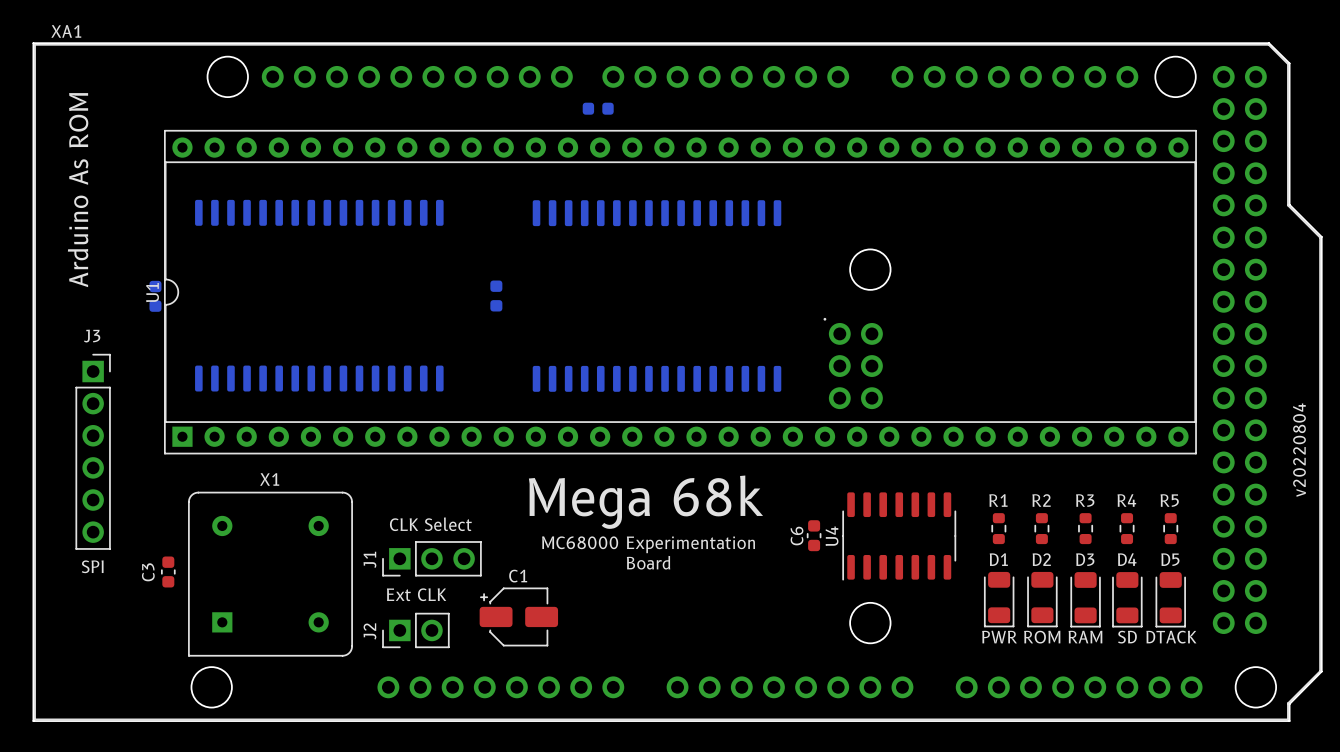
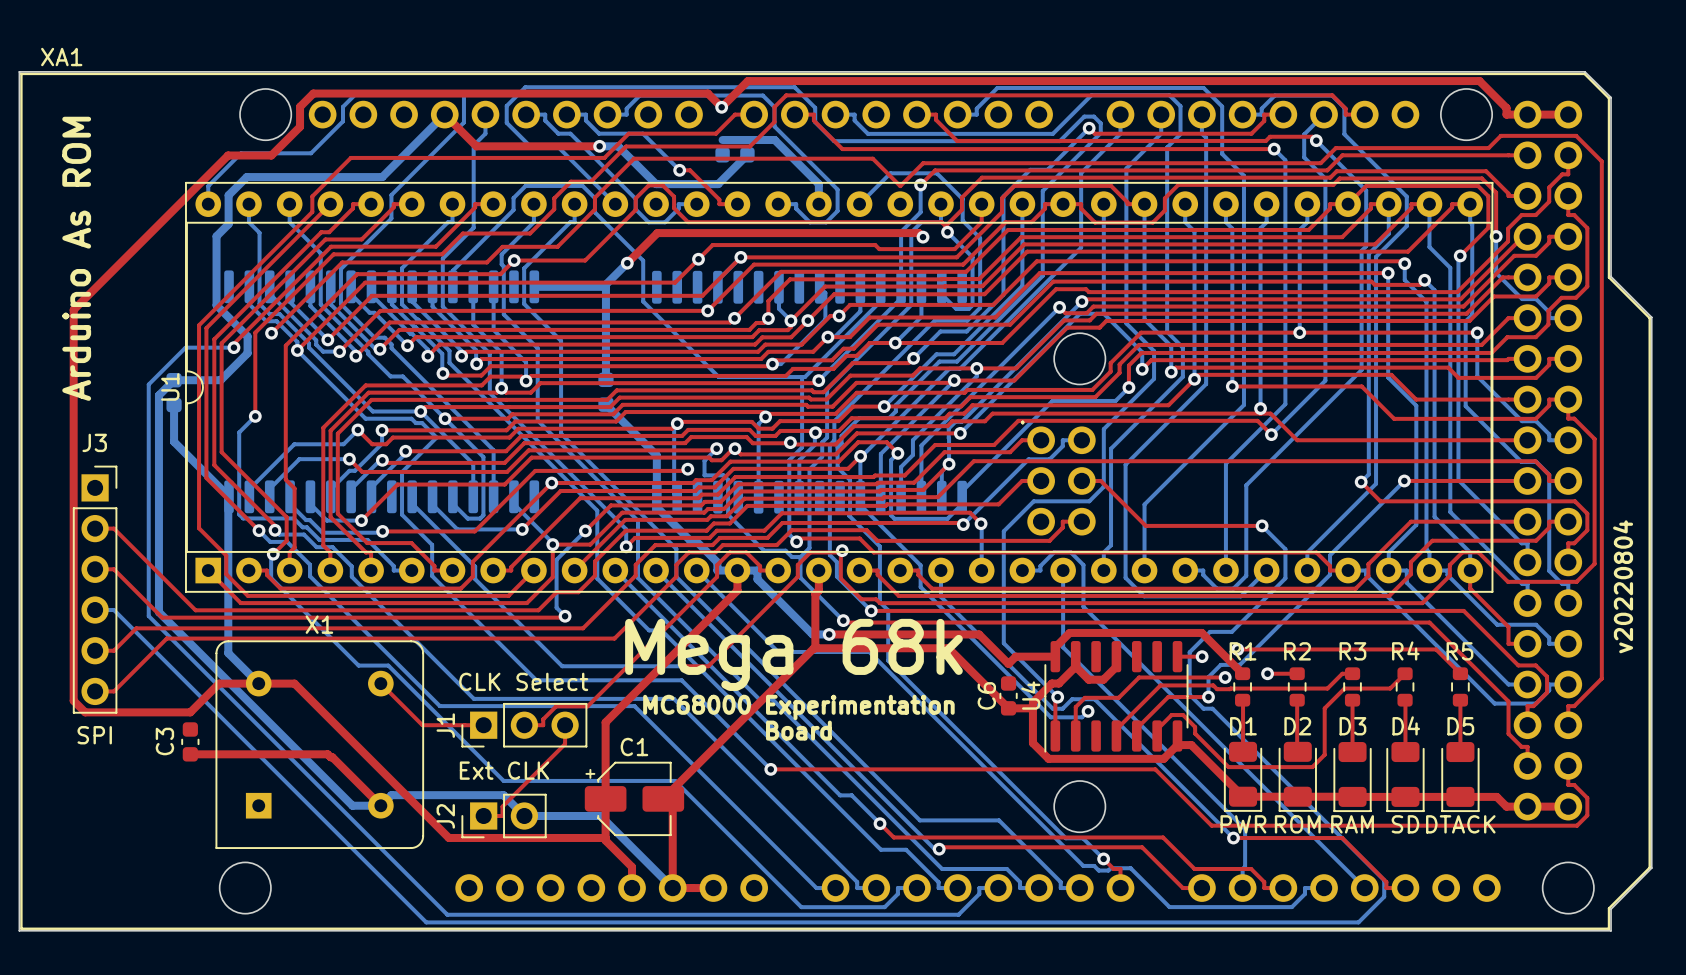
via: none -> (721, 107)
top track: none -> (444, 114) (476, 146) (599, 146)
bottom track: none -> (444, 114) (382, 177) (246, 177) (228, 195) (228, 224) (216, 236) (216, 305) (247, 336) (247, 353) (220, 380) (174, 380) (158, 395) (158, 612) (352, 805) (380, 805) (391, 795) (503, 795) (524, 815) (600, 815) (672, 888)
bottom track: none -> (485, 114) (485, 133) (473, 145) (473, 227) (442, 258) (442, 306) (489, 353) (489, 392) (626, 529) (626, 546)
bottom track: none -> (526, 114) (545, 114) (545, 120) (558, 133) (570, 133) (635, 198) (635, 209) (648, 222) (665, 222) (678, 208) (678, 204) (696, 204)
bottom track: none -> (566, 114) (585, 114) (585, 120) (599, 133) (643, 133) (679, 170)
bottom track: none -> (607, 114) (626, 114) (626, 108) (639, 95) (762, 95) (774, 107) (774, 126) (837, 189) (837, 211) (826, 222) (809, 222) (796, 208) (796, 204) (778, 204)
top track: none -> (754, 114) (735, 114) (716, 133) (628, 133) (604, 157) (350, 157) (312, 196) (312, 211) (199, 325) (199, 528) (226, 555) (226, 574) (247, 595) (508, 595) (533, 570)
top track: none -> (794, 114) (813, 114) (813, 120) (842, 149) (1274, 149)
bottom track: none -> (835, 114) (854, 114) (854, 120) (867, 133) (1052, 133) (1091, 95) (1169, 95) (1180, 106) (1180, 134) (1167, 147) (1167, 331) (1182, 347) (1182, 376) (1111, 448) (1111, 545) (1103, 552) (1103, 570)
top track: none -> (916, 114) (936, 114) (936, 119) (957, 140) (1265, 140) (1270, 136) (1312, 136) (1316, 140)
bottom track: none -> (957, 114) (976, 114) (976, 108) (997, 87) (1203, 87) (1222, 106) (1222, 153) (1243, 175) (1243, 405) (1144, 504) (1144, 570)
bottom track: none -> (1120, 114) (1120, 133) (1081, 173) (1081, 247) (960, 368) (949, 368) (860, 456)
bottom track: none -> (1161, 114) (1161, 133) (1126, 168) (1126, 323) (1154, 351) (1154, 378) (1103, 429) (1103, 486) (1089, 501) (1033, 501) (1003, 531) (1003, 643) (1057, 697)
bottom track: none -> (1201, 114) (1201, 133) (1206, 137) (1206, 384) (1125, 464) (1125, 577) (1144, 596) (1240, 596) (1266, 570)
bottom track: none -> (1242, 114) (1261, 114) (1261, 108) (1274, 95) (1332, 95) (1344, 107) (1344, 134) (1406, 196) (1406, 226) (1376, 256) (1376, 483) (1307, 552) (1307, 570)
top track: none -> (1283, 114) (1264, 114) (1264, 120) (1251, 133) (1094, 133) (1089, 128)
bottom track: none -> (1324, 114) (1304, 134) (1304, 157) (1325, 178) (1325, 380) (1271, 434)
top track: none -> (1364, 114) (1345, 114) (1345, 108) (1332, 95) (786, 95) (774, 107) (774, 121) (749, 146) (626, 146) (590, 181) (570, 181) (554, 198) (554, 209) (530, 233) (462, 233) (442, 254) (333, 254) (255, 332) (255, 416)
top track: none -> (1568, 114) (1506, 114) (1506, 108) (1479, 81) (747, 81) (721, 107) (707, 93) (313, 93) (300, 106) (300, 126) (271, 155) (228, 155) (73, 309) (73, 700) (85, 712) (190, 712) (219, 683) (294, 683) (448, 837) (605, 837)
bottom track: none -> (1089, 128) (1047, 169) (1030, 169) (1003, 196) (1003, 294) (966, 331) (940, 331) (913, 358)
via: none -> (1089, 128)
bottom track: none -> (722, 139) (774, 139) (818, 184) (818, 204)
bottom track: none -> (1316, 140) (1366, 190) (1366, 246) (1361, 250) (1361, 370) (1246, 485) (1246, 575) (1233, 588) (1216, 588) (1203, 575) (1203, 570) (1185, 570)
via: none -> (1316, 140)
bottom track: none -> (599, 146) (618, 146) (656, 184) (718, 184) (747, 154)
via: none -> (599, 146)
bottom track: none -> (1274, 149) (1285, 160) (1285, 404) (1225, 463) (1225, 570)
via: none -> (1274, 149)
top track: none -> (1527, 155) (1342, 155) (1327, 170) (935, 170) (920, 184)
top track: none -> (1568, 155) (1568, 174) (1562, 174) (1549, 187) (1549, 201) (1535, 215) (1521, 215) (1508, 228) (1508, 241) (1457, 292) (1088, 292) (1086, 289) (1056, 289) (1002, 342) (869, 342) (856, 355) (846, 355) (833, 368) (792, 368) (785, 375) (531, 375) (526, 381) (521, 376) (490, 376) (481, 385) (365, 385) (323, 427) (323, 545) (330, 552) (330, 570)
top track: none -> (679, 170) (690, 170) (719, 199) (719, 204) (737, 204)
via: none -> (679, 170)
bottom track: none -> (920, 184) (920, 212) (901, 231) (901, 298) (818, 380)
via: none -> (920, 184)
top track: none -> (1527, 196) (1508, 196) (1508, 193) (1486, 171) (1336, 171) (1330, 177) (981, 177) (961, 197) (961, 209) (945, 226)
top track: none -> (1568, 196) (1568, 215) (1574, 215) (1587, 228) (1587, 286) (1576, 297) (1561, 297) (1548, 310) (1548, 324) (1535, 337) (1507, 337) (1491, 352) (1141, 352) (1128, 365) (1128, 387)
bottom track: none -> (208, 204) (208, 186) (241, 153) (311, 153) (343, 121) (343, 106) (355, 94) (463, 94) (463, 122) (391, 195) (391, 218) (340, 268) (340, 304) (374, 337) (384, 337) (391, 344) (391, 348) (493, 450) (493, 496)
bottom track: none -> (248, 204) (248, 222) (259, 232) (259, 303) (269, 314) (279, 314) (309, 343) (309, 347) (372, 411) (420, 411) (473, 464) (473, 496)
bottom track: none -> (289, 204) (289, 222) (320, 253) (320, 304) (390, 376) (402, 376) (483, 457) (483, 515) (480, 518) (467, 518) (452, 503) (452, 496)
top track: none -> (330, 204) (206, 328) (206, 478) (259, 530)
top track: none -> (371, 204) (353, 204) (353, 208) (329, 232) (321, 232) (214, 339) (214, 465) (275, 525) (275, 530)
top track: none -> (411, 204) (393, 204) (393, 207) (361, 239) (325, 239) (221, 343) (221, 452) (286, 517) (286, 540) (273, 554)
bottom track: none -> (452, 204) (452, 222) (447, 222) (402, 268) (402, 304) (449, 350) (449, 362) (597, 510) (597, 578) (649, 630) (661, 630) (880, 849) (906, 849) (938, 882) (938, 888) (957, 888)
top track: none -> (493, 204) (475, 204) (475, 207) (435, 246) (331, 246) (233, 343) (233, 347)
bottom track: none -> (533, 204) (533, 222) (501, 254) (501, 264) (503, 266) (503, 314) (537, 348) (537, 420) (638, 520) (638, 578) (759, 699) (772, 699) (942, 868) (1006, 868) (1020, 882) (1020, 888) (1039, 888)
bottom track: none -> (574, 204) (574, 222) (570, 222) (524, 268) (524, 303) (561, 340) (561, 433) (676, 548) (676, 576) (919, 820) (999, 820) (1060, 882) (1060, 888) (1079, 888)
bottom track: none -> (615, 204) (557, 146) (530, 146) (506, 122) (506, 105) (525, 87) (794, 87) (815, 107) (815, 122) (834, 141) (1059, 141) (1084, 116) (1093, 116) (1100, 123) (1100, 133) (1042, 191) (1042, 275) (957, 361) (939, 361) (895, 405) (895, 411) (889, 418) (859, 418) (841, 435) (841, 443) (837, 447) (837, 467) (850, 480) (848, 515) (879, 546) (879, 602) (888, 610) (888, 660) (1065, 838) (1082, 838) (1103, 858)
bottom track: none -> (859, 204) (890, 173) (936, 173) (962, 199) (962, 220) (980, 238) (980, 307) (967, 320) (934, 320) (834, 421) (834, 440) (829, 445) (829, 555) (836, 562) (836, 576) (871, 610)
bottom track: none -> (940, 204) (940, 222) (921, 222) (911, 232) (911, 305) (827, 389) (827, 437) (822, 442) (822, 456) (809, 469) (809, 548) (800, 557)
top track: none -> (981, 204) (981, 222) (954, 249) (879, 249) (875, 245) (712, 245) (675, 282) (365, 282) (297, 350)
bottom track: none -> (1022, 204) (1022, 285) (954, 354) (936, 354) (884, 406)
bottom track: none -> (1103, 204) (1103, 313)
top track: none -> (1144, 204) (1127, 204) (1111, 185) (1014, 185) (1002, 198) (1002, 212) (956, 257) (740, 257) (702, 295) (371, 295) (327, 339)
bottom track: none -> (1144, 204) (1144, 319) (1171, 346) (1171, 372)
bottom track: none -> (1185, 204) (1185, 222) (1194, 231) (1194, 379)
bottom track: none -> (1225, 204) (1225, 222) (1232, 228) (1232, 386)
bottom track: none -> (1266, 204) (1266, 222) (1260, 228) (1260, 408)
bottom track: none -> (1307, 204) (1307, 222) (1299, 229) (1299, 332)
top track: none -> (1388, 204) (1370, 204) (1370, 208) (1342, 237) (1021, 237) (979, 279) (790, 279) (768, 300) (768, 318) (763, 322) (756, 322) (749, 329) (399, 329) (379, 349)
bottom track: none -> (1388, 204) (1388, 233) (1368, 253) (1368, 474) (1361, 482)
top track: none -> (1429, 204) (1411, 204) (1411, 208) (1375, 244) (1024, 244) (982, 286) (825, 286) (790, 320) (790, 327) (787, 330) (759, 330) (752, 337) (416, 337) (407, 345)
bottom track: none -> (1429, 204) (1429, 247) (1450, 267) (1450, 512) (1522, 584) (1527, 584) (1527, 603)
top track: none -> (1470, 204) (1452, 204) (1452, 207) (1408, 251) (1027, 251) (984, 294) (834, 294) (791, 337) (762, 337) (755, 344) (439, 344) (427, 356)
bottom track: none -> (1470, 204) (1470, 222) (1472, 224) (1472, 314) (1465, 321) (1465, 406) (1521, 461) (1536, 461) (1549, 474) (1549, 570) (1562, 584) (1568, 584) (1568, 603)
top track: none -> (945, 226) (941, 222) (688, 222) (674, 208) (674, 196) (662, 185) (648, 185) (635, 198) (635, 210) (585, 260) (514, 260) (500, 274) (357, 274) (285, 345) (285, 479) (294, 488) (294, 547) (289, 552) (289, 570)
bottom track: none -> (947, 232) (972, 257) (972, 305) (968, 308) (956, 308) (941, 294) (941, 287)
via: none -> (947, 232)
top track: none -> (923, 237) (918, 233) (657, 233) (627, 263)
via: none -> (923, 237)
top track: none -> (1496, 236) (1496, 192) (1481, 178) (1339, 178) (1333, 184) (1178, 184) (1164, 198) (1164, 210) (1152, 222) (1095, 222) (1081, 208) (1081, 204) (1045, 204) (1045, 208) (1031, 222) (1005, 222) (963, 264) (754, 264) (707, 310) (380, 310) (339, 351)
bottom track: none -> (1496, 236) (1496, 272) (1522, 299) (1536, 299) (1549, 312) (1549, 318) (1568, 318)
via: none -> (1496, 236)
top track: none -> (1527, 236) (1523, 236) (1460, 299) (1084, 299) (1081, 301)
top track: none -> (1568, 236) (1549, 236) (1549, 242) (1536, 255) (1514, 255) (1463, 306) (1093, 306) (1086, 313) (1065, 313) (1059, 307)
top track: none -> (1460, 255) (1488, 227) (1488, 196) (1478, 185) (1366, 185) (1348, 204) (1330, 204) (1330, 208) (1308, 229) (1008, 229) (966, 271) (781, 271) (730, 322) (389, 322) (355, 356)
bottom track: none -> (1460, 255) (1458, 257) (1458, 480) (1521, 543) (1527, 543) (1527, 562)
via: none -> (1460, 255)
via: none -> (740, 257)
via: none -> (698, 259)
via: none -> (514, 260)
bottom track: none -> (627, 263) (605, 284) (605, 379)
via: none -> (627, 263)
top track: none -> (1404, 263) (1402, 261) (1036, 261) (993, 304) (850, 304) (839, 315) (830, 315) (801, 344) (765, 344) (758, 351) (466, 351) (461, 356)
bottom track: none -> (1404, 263) (1404, 280) (1426, 301) (1426, 549) (1429, 552) (1429, 570) (1447, 570) (1447, 575) (1497, 624) (1536, 624) (1549, 637) (1549, 643) (1568, 643)
via: none -> (1404, 263)
top track: none -> (1388, 273) (1039, 273) (995, 317) (869, 317) (850, 337) (827, 337) (813, 351) (768, 351) (761, 359) (481, 359) (476, 363)
bottom track: none -> (1388, 273) (1388, 377) (1416, 405) (1416, 524) (1388, 552) (1388, 570) (1406, 570) (1406, 582) (1508, 684) (1527, 684)
via: none -> (1388, 273)
top track: none -> (1527, 277) (1502, 277) (1466, 313) (1096, 313) (1089, 320) (1064, 320) (1016, 368) (919, 368) (912, 375) (850, 375) (826, 399) (810, 399) (809, 397) (619, 397) (610, 407) (425, 407) (420, 411)
top track: none -> (1568, 277) (1549, 277) (1549, 283) (1536, 296) (1493, 296) (1469, 320) (1106, 320) (1099, 327) (1067, 327) (1014, 380) (856, 382) (832, 406) (807, 406) (806, 404) (622, 404) (613, 414) (512, 414) (508, 418) (445, 418)
top track: none -> (1424, 280) (1419, 284) (1374, 284) (1371, 281) (1053, 281) (1010, 324) (877, 324) (853, 348) (843, 348) (831, 360) (776, 360) (770, 366) (490, 366) (481, 375) (445, 375) (442, 373)
bottom track: none -> (1424, 280) (1434, 290) (1434, 516) (1470, 552) (1470, 570)
via: none -> (1424, 280)
bottom track: none -> (249, 286) (249, 304) (266, 321) (276, 321) (297, 342) (297, 350) (365, 418) (411, 418) (415, 423) (422, 423) (436, 437) (402, 472) (402, 514) (432, 544) (432, 576) (536, 680) (681, 680) (770, 769)
bottom track: none -> (269, 286) (269, 293) (316, 340) (316, 344) (323, 351) (339, 351)
bottom track: none -> (290, 286) (290, 302) (327, 339)
bottom track: none -> (310, 286) (310, 306) (355, 351) (355, 356)
bottom track: none -> (330, 286) (330, 304) (375, 349) (379, 349)
bottom track: none -> (351, 286) (351, 294) (369, 312) (374, 312) (407, 345)
bottom track: none -> (371, 286) (371, 294) (427, 349) (427, 356)
bottom track: none -> (391, 286) (391, 304) (442, 353) (442, 373)
bottom track: none -> (412, 286) (412, 301) (461, 351) (461, 356)
bottom track: none -> (432, 286) (432, 306) (476, 350) (476, 363)
bottom track: none -> (452, 286) (452, 270) (513, 210) (513, 198) (525, 185) (582, 185) (594, 198) (594, 212) (643, 260) (643, 301) (718, 377) (804, 377) (880, 301) (880, 287)
bottom track: none -> (473, 286) (473, 324) (501, 352) (501, 388)
bottom track: none -> (493, 286) (493, 329) (526, 362) (526, 381)
bottom track: none -> (534, 286) (605, 286)
bottom track: none -> (778, 287) (778, 308) (790, 320)
bottom track: none -> (819, 287) (825, 292) (825, 319) (780, 364) (772, 364)
bottom track: none -> (860, 287) (860, 311) (834, 337) (827, 337)
bottom track: none -> (921, 287) (921, 316) (895, 342)
bottom track: none -> (1081, 301) (961, 421) (955, 421) (948, 428) (949, 464) (941, 471) (941, 497)
via: none -> (1081, 301)
bottom track: none -> (1059, 307) (921, 445) (921, 497)
via: none -> (1059, 307)
via: none -> (707, 310)
bottom track: none -> (1103, 313) (1142, 352) (1142, 369)
bottom track: none -> (1103, 313) (1079, 313) (960, 433)
via: none -> (839, 315)
via: none -> (734, 318)
via: none -> (768, 318)
top track: none -> (1527, 318) (1508, 318) (1481, 344) (1139, 344) (1119, 364) (1119, 372) (1095, 397) (970, 397) (961, 406) (884, 406)
via: none -> (790, 320)
via: none -> (807, 320)
via: none -> (1299, 332)
top track: none -> (271, 333) (342, 262) (486, 262) (502, 246) (557, 246) (594, 209) (594, 197) (634, 158) (872, 158) (900, 186) (923, 163) (1320, 163) (1335, 148) (1488, 148) (1500, 135) (1576, 135) (1601, 161) (1601, 678) (1574, 706) (1568, 706) (1568, 725)
via: none -> (271, 333)
top track: none -> (1477, 332) (1141, 332) (1110, 363) (1110, 371) (1092, 389) (856, 392) (835, 413) (765, 414)
bottom track: none -> (1477, 332) (1477, 376) (1522, 421) (1536, 421) (1549, 434) (1549, 440) (1568, 440)
via: none -> (1477, 332)
via: none -> (827, 337)
via: none -> (327, 339)
via: none -> (895, 342)
via: none -> (407, 345)
bottom track: none -> (233, 347) (185, 347) (148, 384) (148, 616) (447, 914) (958, 914) (979, 894) (979, 888) (998, 888)
via: none -> (233, 347)
via: none -> (379, 349)
via: none -> (297, 350)
via: none -> (339, 351)
via: none -> (355, 356)
via: none -> (427, 356)
via: none -> (461, 356)
top track: none -> (913, 358) (908, 363) (852, 363) (823, 392) (813, 392) (812, 390) (616, 390) (607, 399) (371, 399) (337, 433) (337, 513) (367, 543) (411, 543) (434, 566) (434, 570) (452, 570)
via: none -> (913, 358)
top track: none -> (1527, 358) (1151, 360) (1142, 369)
top track: none -> (1568, 358) (1549, 358) (1549, 364) (1536, 377) (1458, 377) (1448, 367) (1175, 367) (1171, 372)
via: none -> (476, 363)
via: none -> (772, 364)
bottom track: none -> (976, 368) (976, 376) (912, 440) (912, 455) (901, 466) (901, 497)
via: none -> (976, 368)
via: none -> (1142, 369)
via: none -> (1171, 372)
via: none -> (442, 373)
bottom track: none -> (802, 377) (802, 447) (789, 460) (789, 534) (796, 541)
via: none -> (1194, 379)
top track: none -> (818, 380) (816, 383) (540, 383) (530, 392) (506, 392) (501, 388) (497, 392) (368, 392) (330, 430) (330, 517) (365, 552) (371, 552) (371, 570)
via: none -> (818, 380)
bottom track: none -> (954, 380) (880, 453) (880, 497)
via: none -> (954, 380)
via: none -> (526, 381)
top track: none -> (1232, 386) (1361, 386) (1394, 418) (1535, 418) (1549, 405) (1549, 399) (1568, 399) (1568, 418) (1574, 418) (1594, 438) (1594, 563) (1576, 581) (1507, 581) (1478, 552) (1462, 552) (1449, 564) (1449, 575) (1422, 603) (879, 603) (876, 599) (861, 599) (840, 578) (842, 550)
via: none -> (1232, 386)
via: none -> (501, 388)
bottom track: none -> (1128, 387) (1115, 400) (1052, 400) (962, 491) (962, 504) (947, 518) (894, 518) (891, 515) (891, 460) (897, 453)
via: none -> (1128, 387)
top track: none -> (1527, 399) (1416, 399) (1391, 374) (1198, 374) (1168, 405) (972, 405) (964, 413) (949, 413) (945, 418) (851, 418) (838, 430) (780, 430) (775, 435) (755, 435) (749, 429) (688, 429) (682, 435) (521, 435) (506, 451) (405, 451)
bottom track: none -> (605, 404) (656, 455) (656, 507) (690, 540) (695, 540) (717, 562) (717, 570) (757, 570) (757, 579) (812, 634) (829, 634)
bottom track: none -> (174, 405) (174, 441) (229, 496) (228, 653) (258, 683)
top track: none -> (884, 406) (853, 406) (838, 421) (780, 421) (772, 428) (758, 428) (751, 421) (679, 421) (672, 428) (518, 428) (509, 437) (392, 437) (386, 444) (372, 444) (357, 429)
via: none -> (884, 406)
via: none -> (1260, 408)
via: none -> (420, 411)
top track: none -> (765, 414) (762, 412) (625, 412) (616, 421) (515, 421) (506, 430) (382, 430)
bottom track: none -> (255, 416) (239, 432) (239, 514) (243, 518) (293, 518) (302, 527) (306, 527) (319, 539) (367, 539) (393, 566) (393, 570) (411, 570)
via: none -> (255, 416)
bottom track: none -> (765, 416) (758, 423) (758, 497)
via: none -> (765, 416)
via: none -> (445, 418)
bottom track: none -> (677, 423) (674, 426) (674, 494) (677, 497)
via: none -> (677, 423)
bottom track: none -> (357, 429) (343, 444) (294, 444) (249, 489) (249, 496)
via: none -> (357, 429)
bottom track: none -> (382, 430) (382, 443) (354, 470) (349, 470) (330, 489) (330, 496)
via: none -> (382, 430)
bottom track: none -> (815, 432) (814, 444) (799, 460) (799, 497)
via: none -> (815, 432)
top track: none -> (960, 433) (856, 433) (835, 454) (740, 454) (733, 448) (721, 460) (711, 460) (709, 457) (531, 457) (504, 484) (397, 484) (361, 520)
via: none -> (960, 433)
top track: none -> (1271, 434) (1257, 420) (1018, 420) (994, 445) (935, 445) (904, 475) (735, 477) (717, 494) (701, 494) (698, 498) (580, 498) (511, 567) (511, 570) (493, 570)
via: none -> (1271, 434)
top track: none -> (1041, 440) (1022, 440) (1010, 452) (944, 452) (914, 482) (738, 484) (720, 501) (704, 501) (701, 505) (610, 505) (585, 530)
bottom track: none -> (1081, 440) (1062, 440) (1062, 446) (1049, 459) (1028, 459) (963, 524)
top track: none -> (1527, 440) (1297, 440) (1270, 413) (992, 413) (984, 421) (952, 421) (947, 426) (853, 426) (835, 444) (752, 443) (746, 437) (691, 437) (685, 443) (524, 443) (504, 462) (384, 462) (382, 460)
via: none -> (790, 442)
top track: none -> (716, 448) (715, 450) (528, 450) (507, 471) (362, 471) (349, 459)
bottom track: none -> (716, 448) (704, 460) (704, 475) (723, 475) (728, 479) (728, 514) (763, 550) (785, 550) (792, 557) (800, 557)
via: none -> (716, 448)
via: none -> (735, 448)
bottom track: none -> (405, 451) (405, 453) (371, 487) (371, 496)
via: none -> (405, 451)
top track: none -> (897, 453) (886, 442) (858, 442) (838, 461) (730, 461) (711, 480) (695, 480) (693, 483) (551, 483) (472, 561) (472, 576) (460, 588) (280, 588) (267, 575) (267, 570) (248, 570)
via: none -> (897, 453)
top track: none -> (860, 456) (848, 468) (733, 468) (714, 487) (698, 487) (695, 491) (560, 491) (522, 529)
bottom track: none -> (860, 456) (860, 505) (920, 565) (920, 587) (1050, 717) (1082, 717) (1088, 711)
via: none -> (860, 456)
bottom track: none -> (349, 459) (299, 459) (269, 488) (269, 496)
via: none -> (349, 459)
bottom track: none -> (382, 460) (380, 460) (351, 489) (351, 496)
via: none -> (382, 460)
top track: none -> (949, 464) (923, 489) (741, 491) (723, 509) (707, 509) (704, 512) (622, 512) (590, 544) (552, 544) (552, 577) (526, 603) (240, 603) (208, 570)
via: none -> (949, 464)
top track: none -> (687, 469) (686, 470) (535, 470) (474, 531) (382, 531)
via: none -> (687, 469)
top track: none -> (1041, 480) (1022, 480) (998, 504) (747, 505) (729, 523) (713, 523) (706, 530) (625, 530) (594, 561) (594, 575) (578, 592) (556, 592) (538, 610) (195, 610) (113, 528) (95, 528)
top track: none -> (1081, 480) (1100, 480) (1145, 525) (1262, 525)
top track: none -> (1361, 482) (1380, 501) (1574, 501) (1587, 513) (1587, 530) (1574, 543) (1568, 543) (1568, 562)
via: none -> (1361, 482)
top track: none -> (1404, 480) (1527, 480)
bottom track: none -> (1404, 480) (1330, 555) (1330, 574) (1239, 664) (1220, 664) (1208, 677) (1208, 697)
via: none -> (1404, 480)
top track: none -> (1568, 480) (1549, 480) (1549, 475) (1535, 461) (973, 461) (937, 497) (744, 498) (726, 516) (710, 516) (707, 519) (625, 519) (574, 570)
via: none -> (551, 483)
bottom track: none -> (290, 496) (290, 504) (322, 532) (382, 531)
bottom track: none -> (310, 496) (310, 504) (326, 520) (361, 520)
bottom track: none -> (412, 496) (412, 503) (475, 566) (475, 579) (562, 666) (681, 666)
bottom track: none -> (432, 496) (432, 504) (457, 529) (522, 529)
bottom track: none -> (513, 496) (513, 504) (552, 544)
via: none -> (361, 520)
top track: none -> (1081, 521) (1062, 521) (1062, 527) (1049, 540) (877, 540) (866, 530) (791, 530) (776, 545) (722, 545) (715, 552) (688, 552) (676, 564) (676, 576) (614, 638) (166, 638) (113, 691) (95, 691)
top track: none -> (1527, 521) (1410, 521) (1368, 564) (1368, 575) (1355, 588) (931, 588) (918, 575) (918, 570) (900, 570)
top track: none -> (1568, 521) (1549, 521) (1549, 527) (1536, 540) (1432, 540) (1410, 562) (1410, 574) (1389, 595) (898, 595) (877, 574) (877, 570) (859, 570)
top track: none -> (981, 523) (970, 512) (781, 513) (764, 530) (716, 530) (709, 537) (635, 537) (626, 546)
bottom track: none -> (981, 523) (981, 570)
via: none -> (981, 523)
top track: none -> (963, 524) (961, 522) (782, 522) (767, 537) (719, 537) (712, 545) (655, 545) (635, 564) (635, 575) (583, 628) (136, 628) (113, 650) (95, 650)
via: none -> (963, 524)
bottom track: none -> (1262, 525) (1285, 549) (1285, 578) (1231, 631) (1210, 631) (1189, 652) (1189, 694) (1203, 708) (1212, 708) (1384, 880) (1384, 896) (1358, 922) (426, 922) (113, 610) (95, 610)
via: none -> (1262, 525)
bottom track: none -> (275, 530) (279, 534) (303, 534) (316, 547) (332, 547) (351, 566) (351, 576) (473, 698) (674, 698) (857, 882) (857, 888) (876, 888)
via: none -> (275, 530)
via: none -> (522, 529)
bottom track: none -> (259, 530) (270, 541) (287, 541) (310, 564) (310, 576) (439, 706) (634, 706) (816, 888) (835, 888)
via: none -> (259, 530)
via: none -> (382, 531)
bottom track: none -> (585, 530) (556, 559) (556, 607) (565, 616)
via: none -> (585, 530)
top track: none -> (796, 541) (799, 538) (859, 538) (873, 552) (1316, 552) (1330, 566) (1330, 570) (1348, 570)
via: none -> (796, 541)
via: none -> (552, 544)
via: none -> (626, 546)
via: none -> (842, 550)
top track: none -> (840, 552) (810, 552) (797, 565) (797, 576) (708, 666) (681, 666)
bottom track: none -> (273, 554) (271, 556) (271, 578) (358, 665) (388, 665) (503, 780) (675, 780) (801, 907) (884, 907) (897, 894) (897, 888) (916, 888)
via: none -> (273, 554)
bottom track: none -> (800, 557) (800, 577) (843, 620)
top track: none -> (95, 569) (113, 569) (162, 617) (565, 616)
bottom track: none -> (615, 570) (840, 795) (851, 795) (880, 823)
bottom track: none -> (656, 570) (934, 849) (939, 849)
bottom track: none -> (696, 570) (778, 651) (869, 651) (1083, 865) (1094, 865) (1098, 870) (1130, 868) (1169, 907) (1291, 907) (1304, 894) (1304, 888) (1324, 888)
top track: none -> (737, 570) (737, 590) (605, 722) (605, 840) (632, 866) (632, 888)
top track: none -> (778, 570) (760, 570) (760, 566) (746, 552) (729, 552) (717, 565) (717, 576) (587, 706) (556, 706) (543, 719) (543, 725) (524, 725)
top track: none -> (818, 570) (818, 590) (815, 594) (815, 648)
bottom track: none -> (940, 570) (940, 596) (1052, 708) (1062, 708) (1072, 699) (1094, 699) (1233, 838)
bottom track: none -> (1022, 570) (1040, 570) (1040, 566) (1054, 552) (1070, 552) (1083, 565) (1083, 606) (1364, 888)
bottom track: none -> (1063, 570) (1063, 647) (1245, 829) (1245, 866) (1242, 868) (1242, 888)
bottom track: none -> (1348, 570) (1366, 570) (1366, 575) (1494, 703) (1536, 703) (1549, 690) (1549, 684) (1568, 684)
top track: none -> (1470, 570) (1470, 588) (1508, 626) (1508, 643) (1527, 643)
top track: none -> (871, 610) (1463, 610) (1518, 665) (1535, 665) (1547, 676) (1547, 692) (1533, 706) (1527, 706) (1527, 725)
via: none -> (871, 610)
via: none -> (565, 616)
top track: none -> (843, 620) (845, 622) (1429, 622) (1508, 701) (1508, 733) (1521, 746) (1527, 746) (1527, 765)
via: none -> (843, 620)
top track: none -> (829, 634) (979, 634) (1008, 663) (1015, 656) (1055, 656) (1055, 647) (1069, 632) (1201, 632) (1242, 673)
via: none -> (829, 634)
top track: none -> (1237, 649) (1436, 649) (1460, 673)
via: none -> (1237, 649)
top track: none -> (1116, 656) (1116, 666) (1103, 679) (1088, 679) (1075, 666)
top track: none -> (1177, 656) (1202, 656)
via: none -> (1202, 656)
top track: none -> (1075, 666) (1058, 683) (1051, 683) (1032, 702) (1032, 743) (1048, 758) (1163, 758) (1177, 745)
top track: none -> (1267, 673) (1297, 673)
via: none -> (1267, 673)
top track: none -> (1352, 673) (1342, 673) (1327, 688) (1217, 689) (1213, 685) (1160, 685) (1116, 729) (1116, 735)
top track: none -> (1405, 673) (1390, 688) (1344, 688) (1324, 708) (1324, 754) (1312, 767) (1228, 767) (1195, 733) (1195, 727) (1183, 715) (1171, 715) (1157, 729) (1157, 735)
top track: none -> (1225, 677) (1139, 677) (1118, 697) (1084, 697) (1075, 707) (1075, 735)
via: none -> (1225, 677)
top track: none -> (380, 683) (422, 725) (483, 725)
top track: none -> (1057, 697) (1055, 699) (1055, 735)
via: none -> (1057, 697)
top track: none -> (1208, 697) (1168, 697) (1136, 728) (1136, 735)
via: none -> (1208, 697)
top track: none -> (1242, 700) (1243, 751)
top track: none -> (1297, 700) (1297, 751)
top track: none -> (1352, 700) (1352, 752)
top track: none -> (1405, 700) (1405, 752)
top track: none -> (1460, 700) (1460, 752)
top track: none -> (1032, 708) (1008, 708) (948, 648) (813, 648) (663, 798) (672, 808) (672, 888) (713, 888)
via: none -> (1088, 711)
top track: none -> (565, 725) (565, 744) (502, 806) (502, 815) (483, 815)
top track: none -> (1177, 745) (1191, 745) (1243, 796) (1352, 796)
top track: none -> (190, 754) (327, 754) (380, 805)
top track: none -> (1568, 765) (1568, 784) (1574, 784) (1587, 798) (1587, 815) (1577, 825) (1211, 825) (1155, 769) (770, 769)
via: none -> (770, 769)
top track: none -> (1352, 796) (1496, 796) (1506, 806) (1568, 806)
top track: none -> (880, 823) (893, 837) (1163, 837) (1194, 868) (1251, 868) (1264, 882) (1264, 888) (1283, 888)
via: none -> (880, 823)
top track: none -> (1233, 838) (1342, 838) (1386, 882) (1386, 888) (1405, 888)
via: none -> (1233, 838)
top track: none -> (939, 849) (941, 847) (1142, 847) (1182, 888) (1201, 888)
via: none -> (939, 849)
top track: none -> (1103, 858) (1113, 868) (1120, 868) (1120, 888)
via: none -> (1103, 858)

